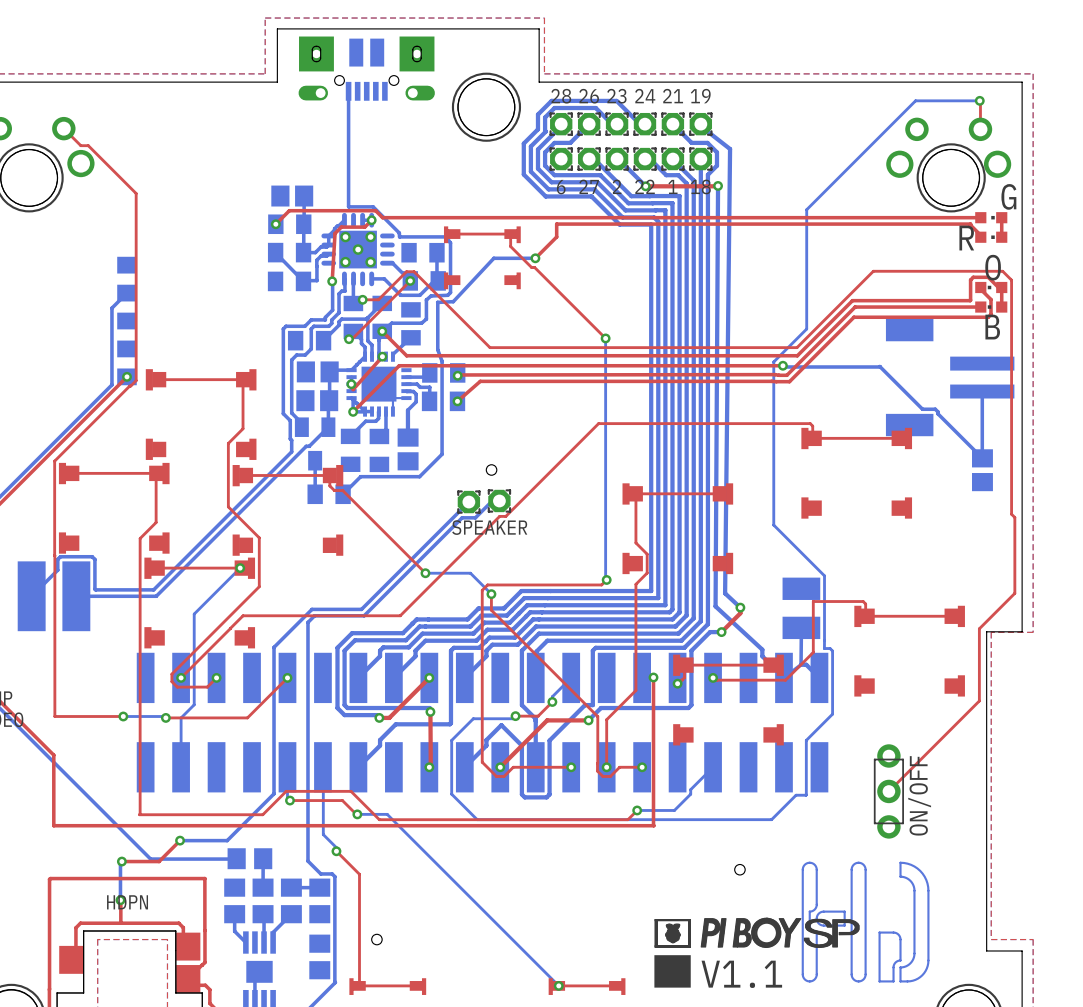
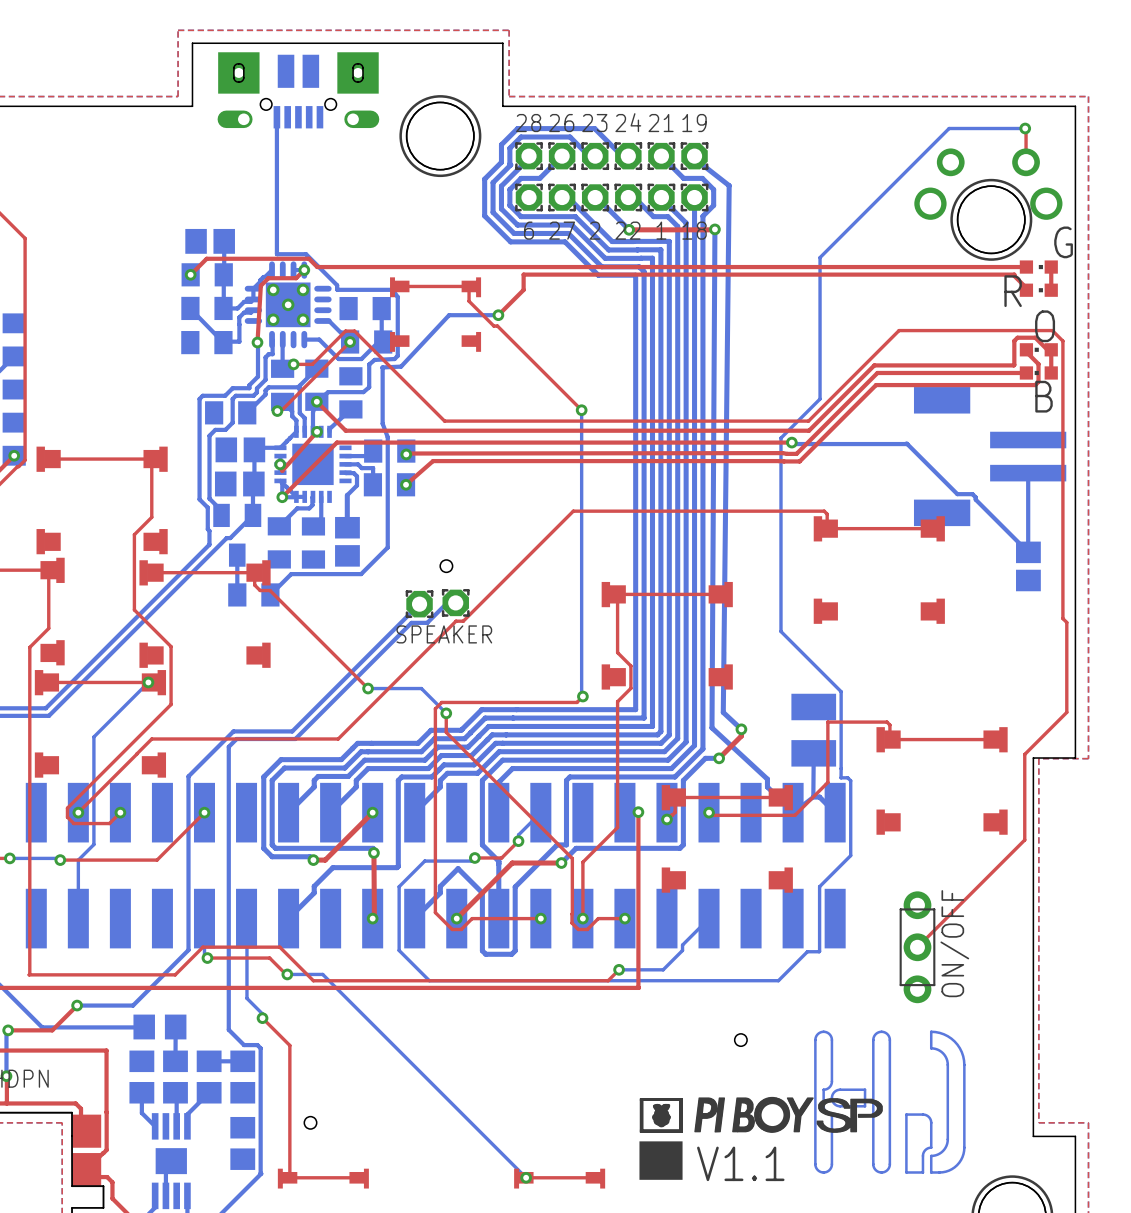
bottom track: (392, 398) (392, 411) -> none
bottom track: (392, 398) (406, 398) -> none

